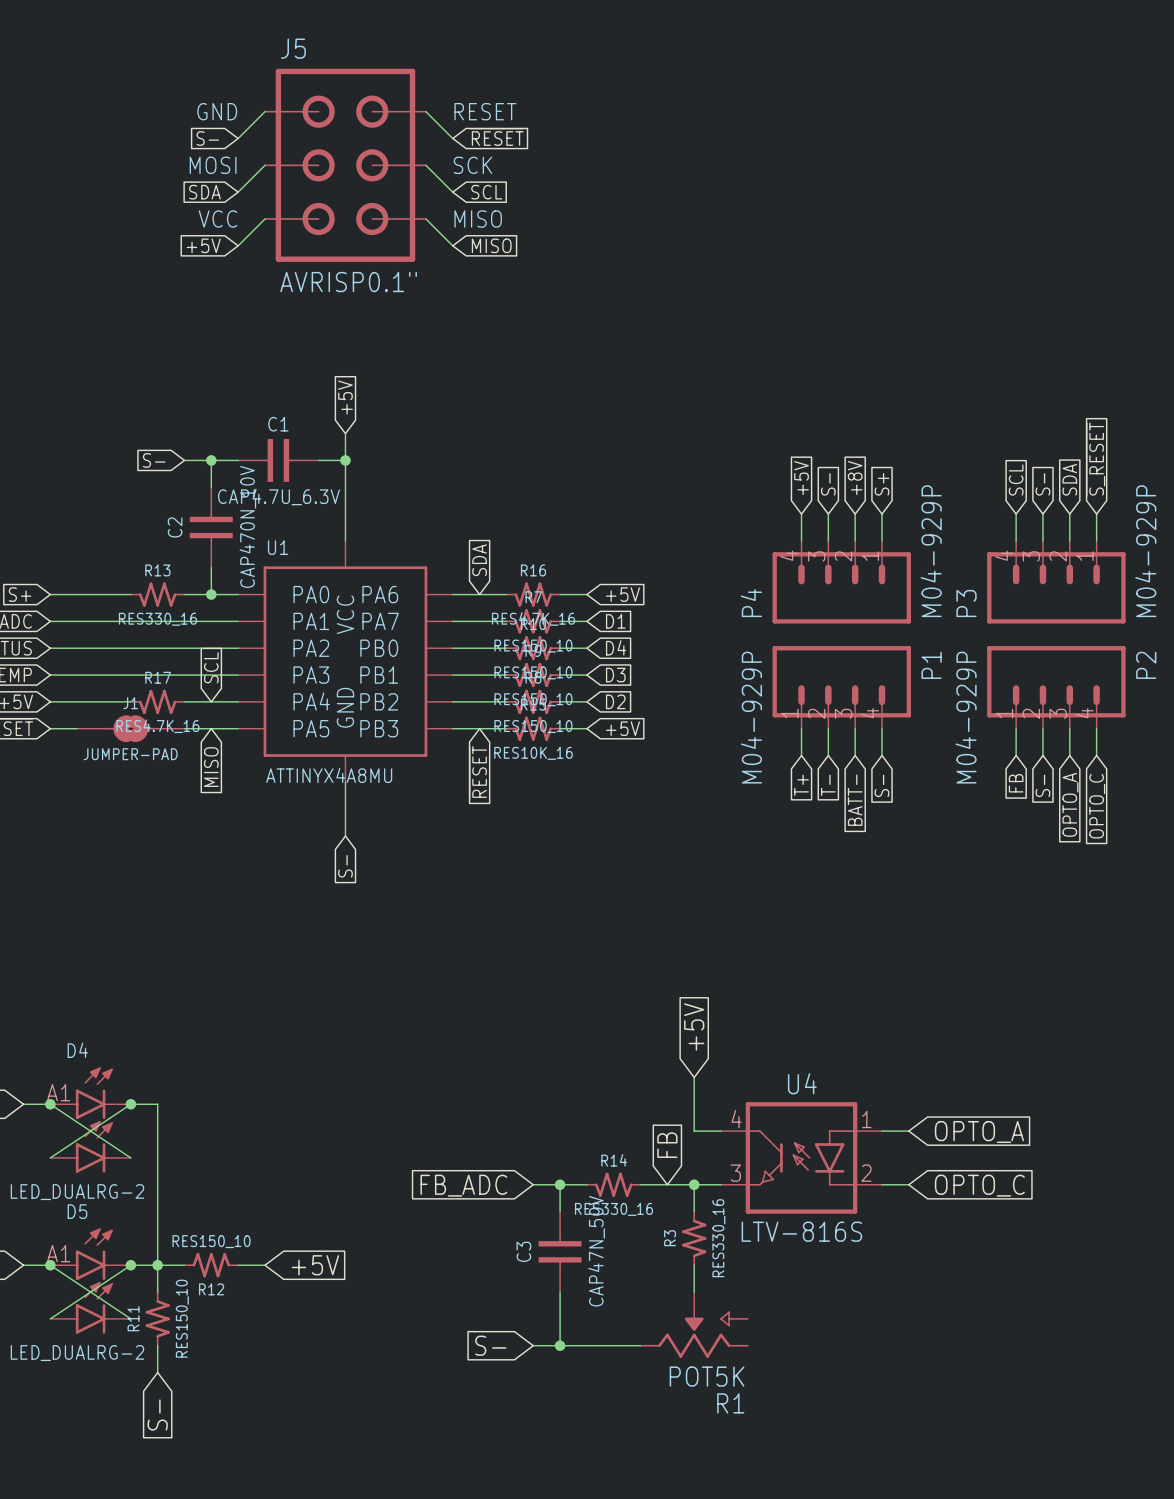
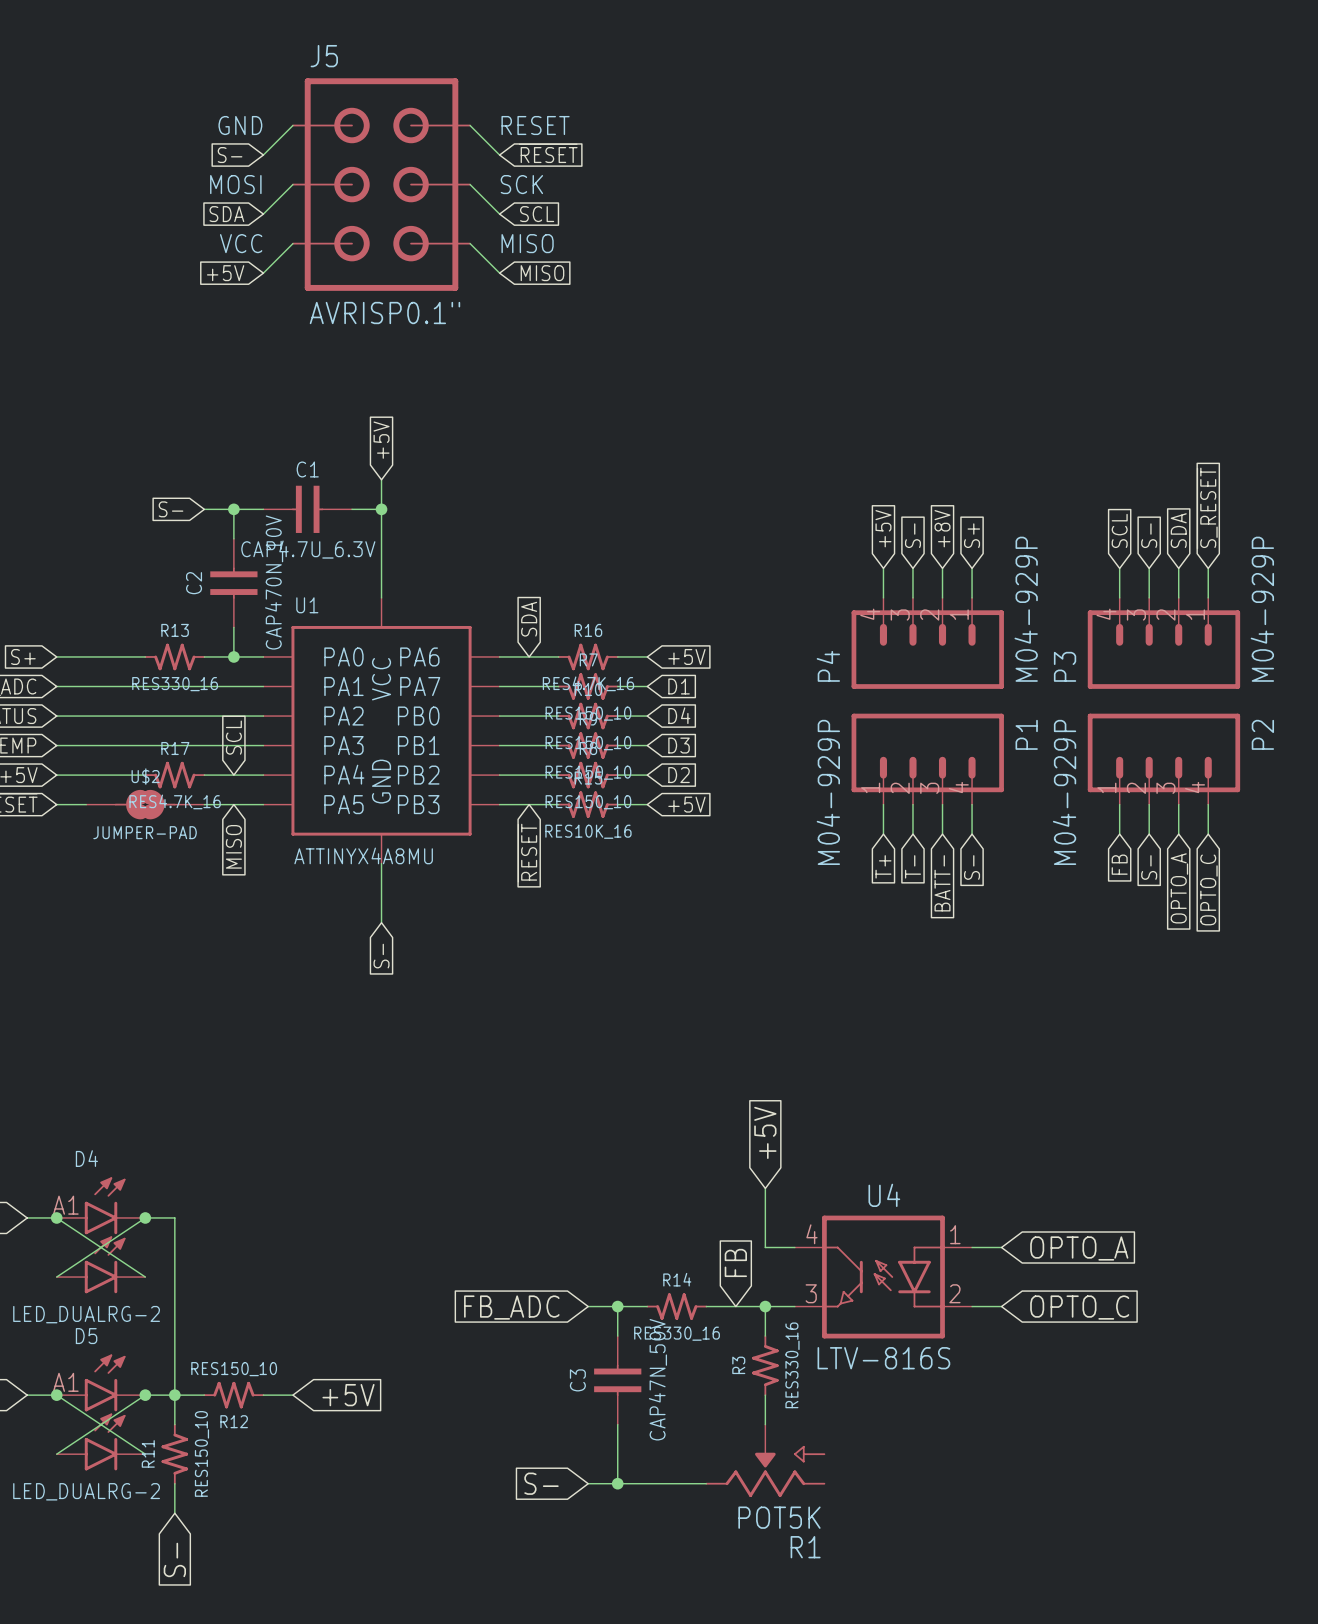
J1 name: J1 (130, 703) -> U$2 (145, 776)

